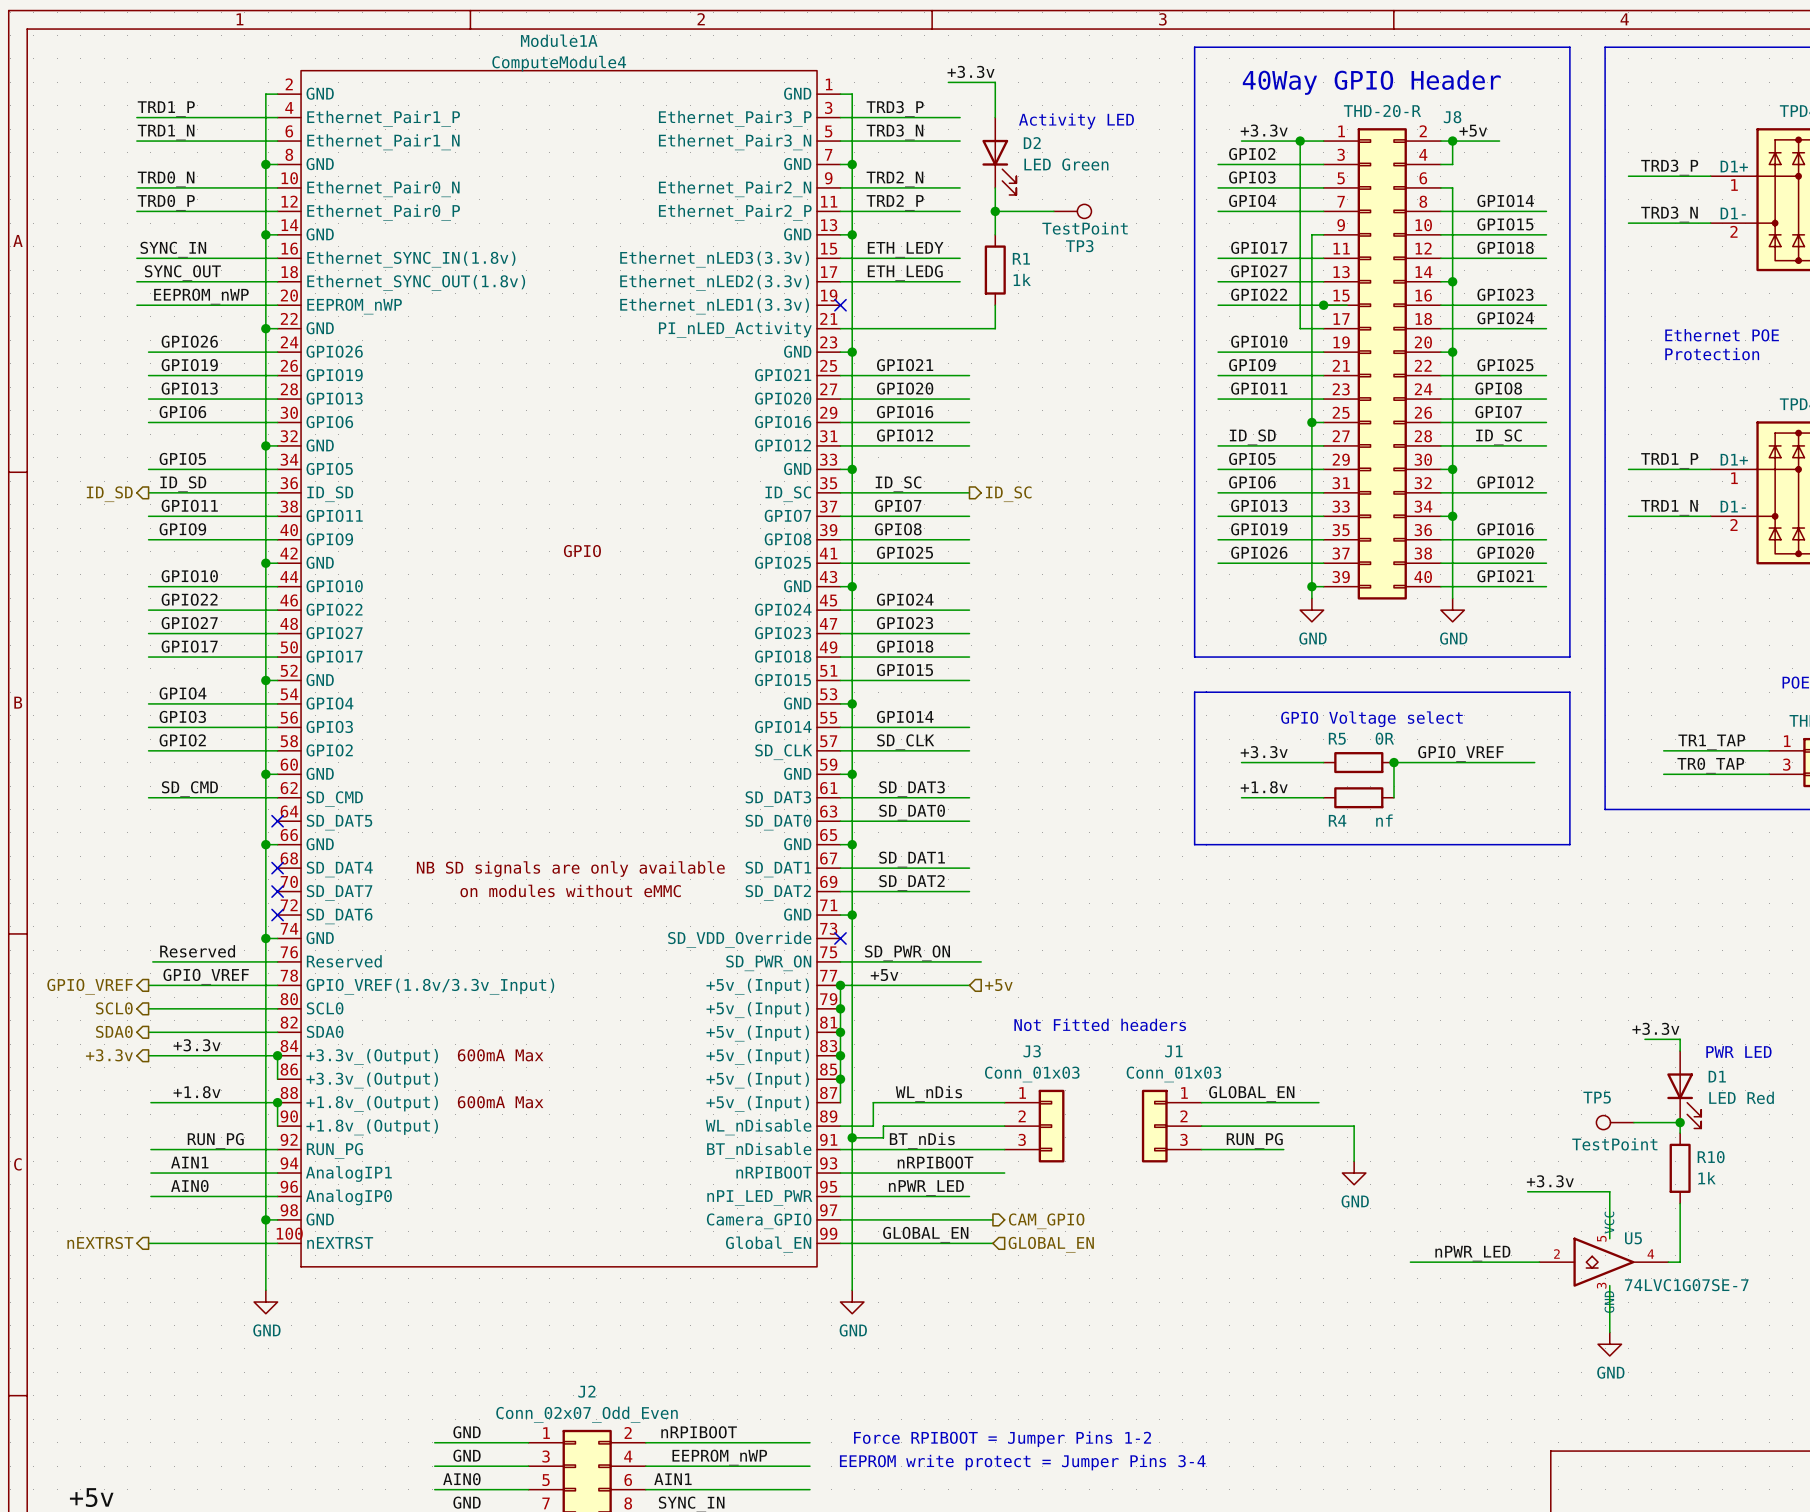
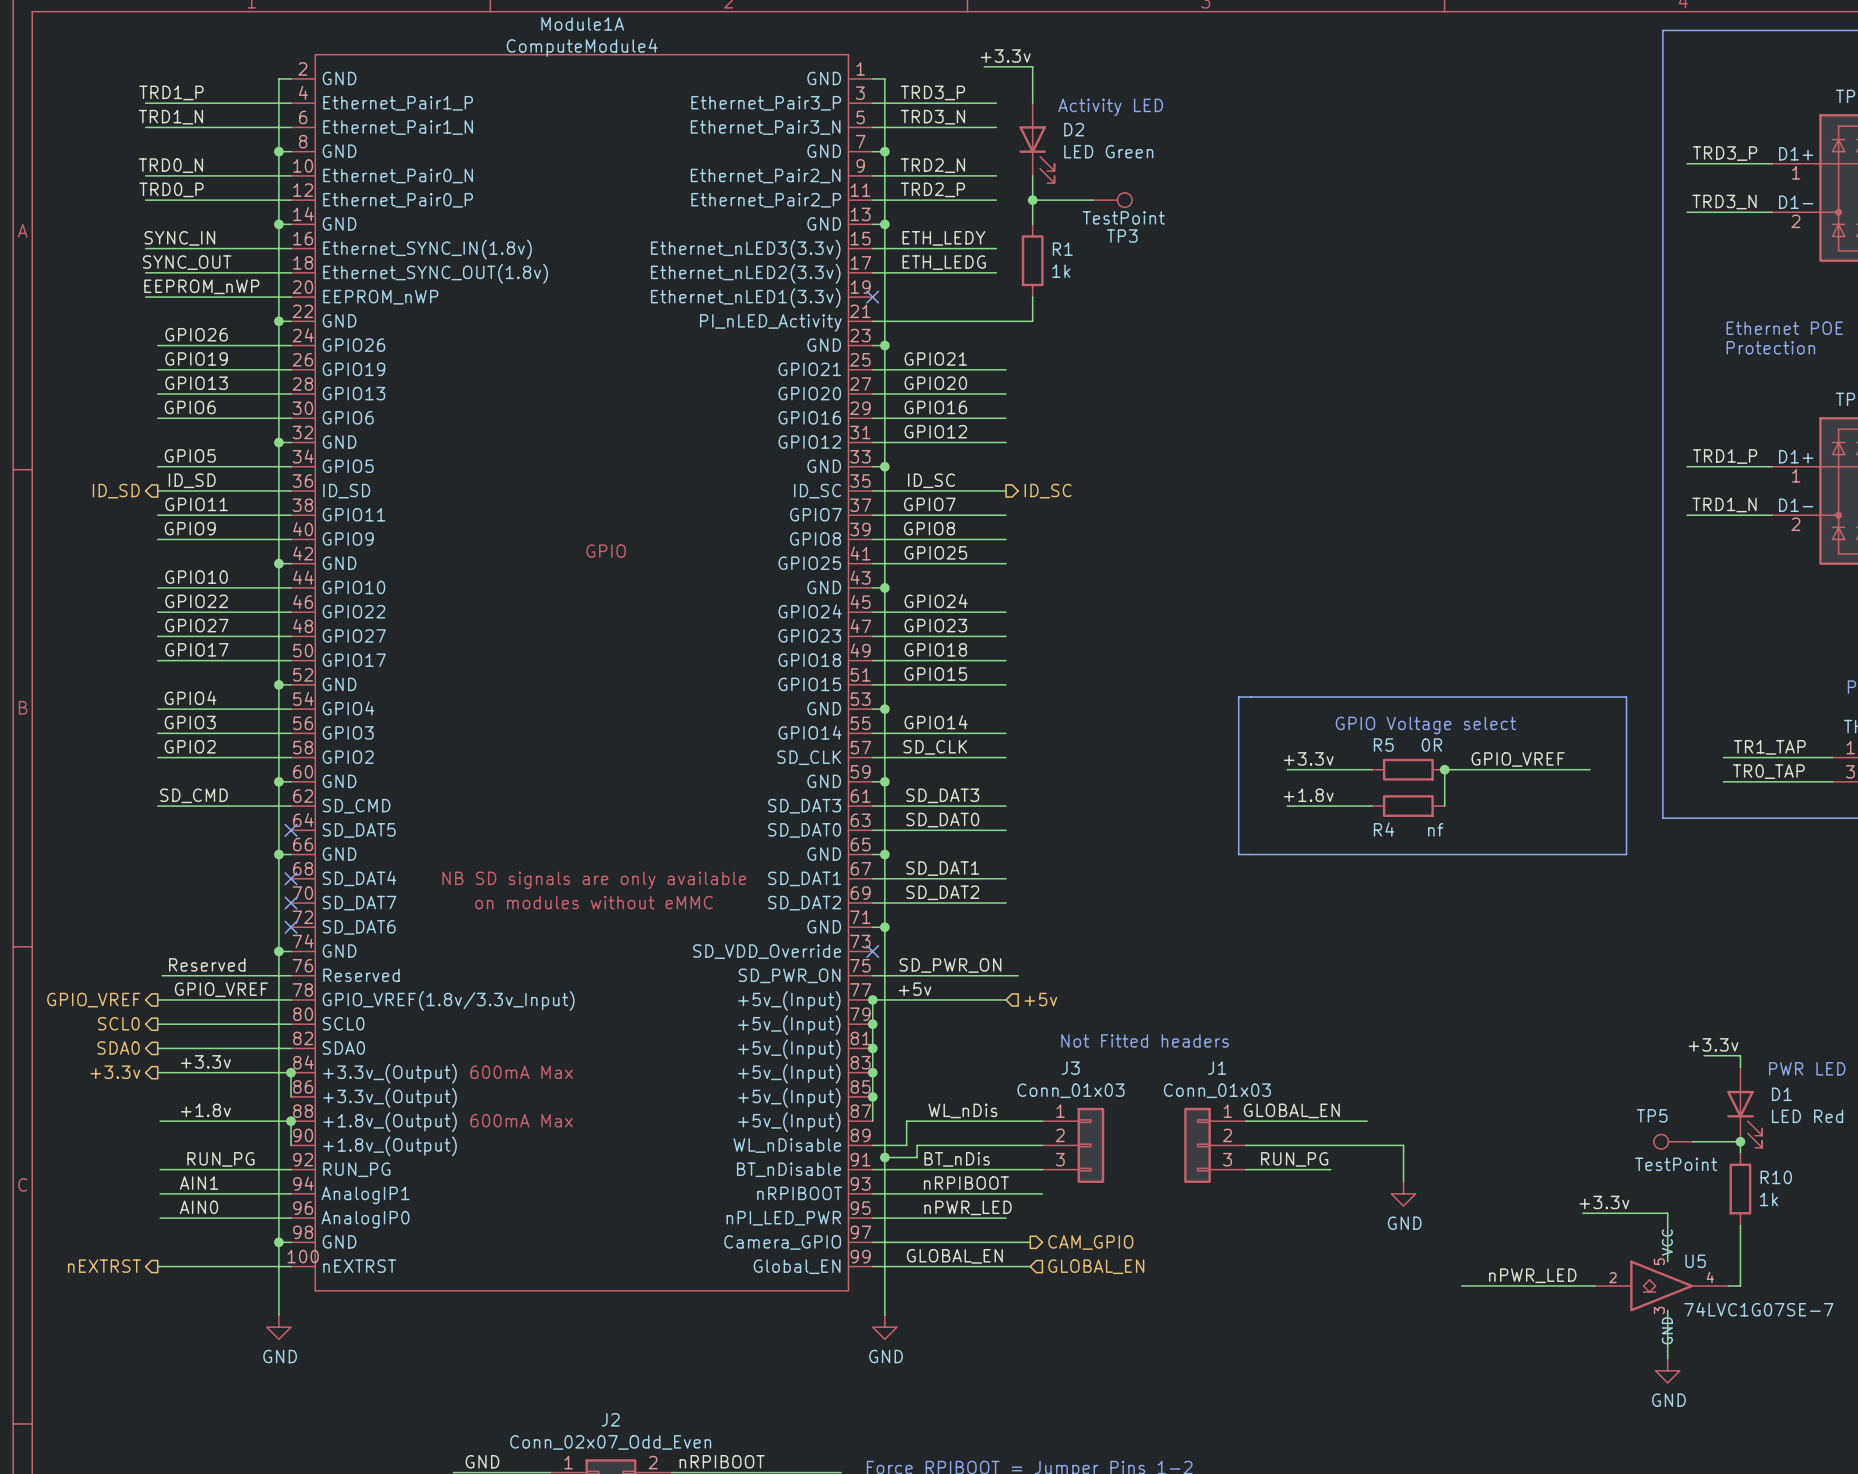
line: (1194, 47) (1569, 47) (1569, 657) (1194, 657) (1194, 47) -> none
text: 40Way GPIO Header (1371, 82) -> none
label: +3.3v (1264, 130) -> none
label: +5v (1473, 130) -> none
wire: (1241, 141) (1323, 141) -> none
wire: (1300, 141) (1300, 328) (1323, 328) -> none
junction: (1300, 141) -> none
wire: (1440, 141) (1499, 141) -> none
wire: (1452, 141) (1452, 164) (1440, 164) -> none
junction: (1452, 141) -> none
label: GPIO2 (1252, 154) -> none
wire: (1218, 164) (1323, 164) -> none
label: GPIO3 (1252, 177) -> none
wire: (1218, 187) (1323, 187) -> none
wire: (1440, 187) (1452, 187) (1452, 598) -> none
label: GPIO4 (1252, 200) -> none
label: GPIO14 (1505, 200) -> none
wire: (1218, 211) (1323, 211) -> none
wire: (1440, 211) (1546, 211) -> none
label: GPIO15 (1505, 224) -> none
wire: (1323, 234) (1311, 234) (1311, 598) -> none
wire: (1440, 234) (1546, 234) -> none
label: GPIO17 (1259, 247) -> none
label: GPIO18 (1505, 247) -> none
wire: (1218, 258) (1323, 258) -> none
wire: (1440, 258) (1546, 258) -> none
label: GPIO27 (1259, 271) -> none
wire: (1218, 281) (1323, 281) -> none
wire: (1440, 281) (1452, 281) -> none
junction: (1452, 281) -> none
label: GPIO22 (1259, 294) -> none
label: GPIO23 (1505, 294) -> none
wire: (1218, 305) (1347, 305) -> none
junction: (1323, 305) -> none
wire: (1440, 305) (1546, 305) -> none
label: GPIO24 (1505, 318) -> none
wire: (1440, 328) (1546, 328) -> none
label: GPIO10 (1259, 341) -> none
wire: (1218, 352) (1323, 352) -> none
wire: (1440, 352) (1452, 352) -> none
junction: (1452, 352) -> none
J8: THD-20-R (1382, 363) -> none
label: GPIO9 (1252, 365) -> none
label: GPIO25 (1505, 365) -> none
wire: (1218, 375) (1323, 375) -> none
wire: (1440, 375) (1546, 375) -> none
label: GPIO11 (1259, 388) -> none
label: GPIO8 (1498, 388) -> none
wire: (1218, 399) (1323, 399) -> none
wire: (1440, 399) (1546, 399) -> none
label: GPIO7 (1498, 412) -> none
wire: (1311, 422) (1323, 422) -> none
junction: (1311, 422) -> none
wire: (1440, 422) (1546, 422) -> none
label: ID_SD (1252, 437) -> none
label: ID_SC (1498, 437) -> none
wire: (1218, 445) (1323, 445) -> none
wire: (1440, 445) (1546, 445) -> none
label: GPIO5 (1252, 458) -> none
wire: (1218, 469) (1323, 469) -> none
wire: (1440, 469) (1452, 469) -> none
junction: (1452, 469) -> none
label: GPIO6 (1252, 482) -> none
label: GPIO12 (1505, 482) -> none
wire: (1218, 492) (1323, 492) -> none
wire: (1440, 492) (1546, 492) -> none
label: GPIO13 (1259, 505) -> none
wire: (1218, 516) (1323, 516) -> none
wire: (1440, 516) (1452, 516) -> none
junction: (1452, 516) -> none
label: GPIO19 (1259, 529) -> none
label: GPIO16 (1505, 529) -> none
wire: (1218, 539) (1323, 539) -> none
wire: (1440, 539) (1546, 539) -> none
label: GPIO26 (1259, 552) -> none
label: GPIO20 (1505, 552) -> none
wire: (1218, 563) (1323, 563) -> none
wire: (1440, 563) (1546, 563) -> none
label: GPIO21 (1505, 576) -> none
wire: (1311, 586) (1323, 586) -> none
junction: (1311, 586) -> none
wire: (1440, 586) (1546, 586) -> none
power symbol: GND (1311, 610) -> none
power symbol: GND (1452, 610) -> none

